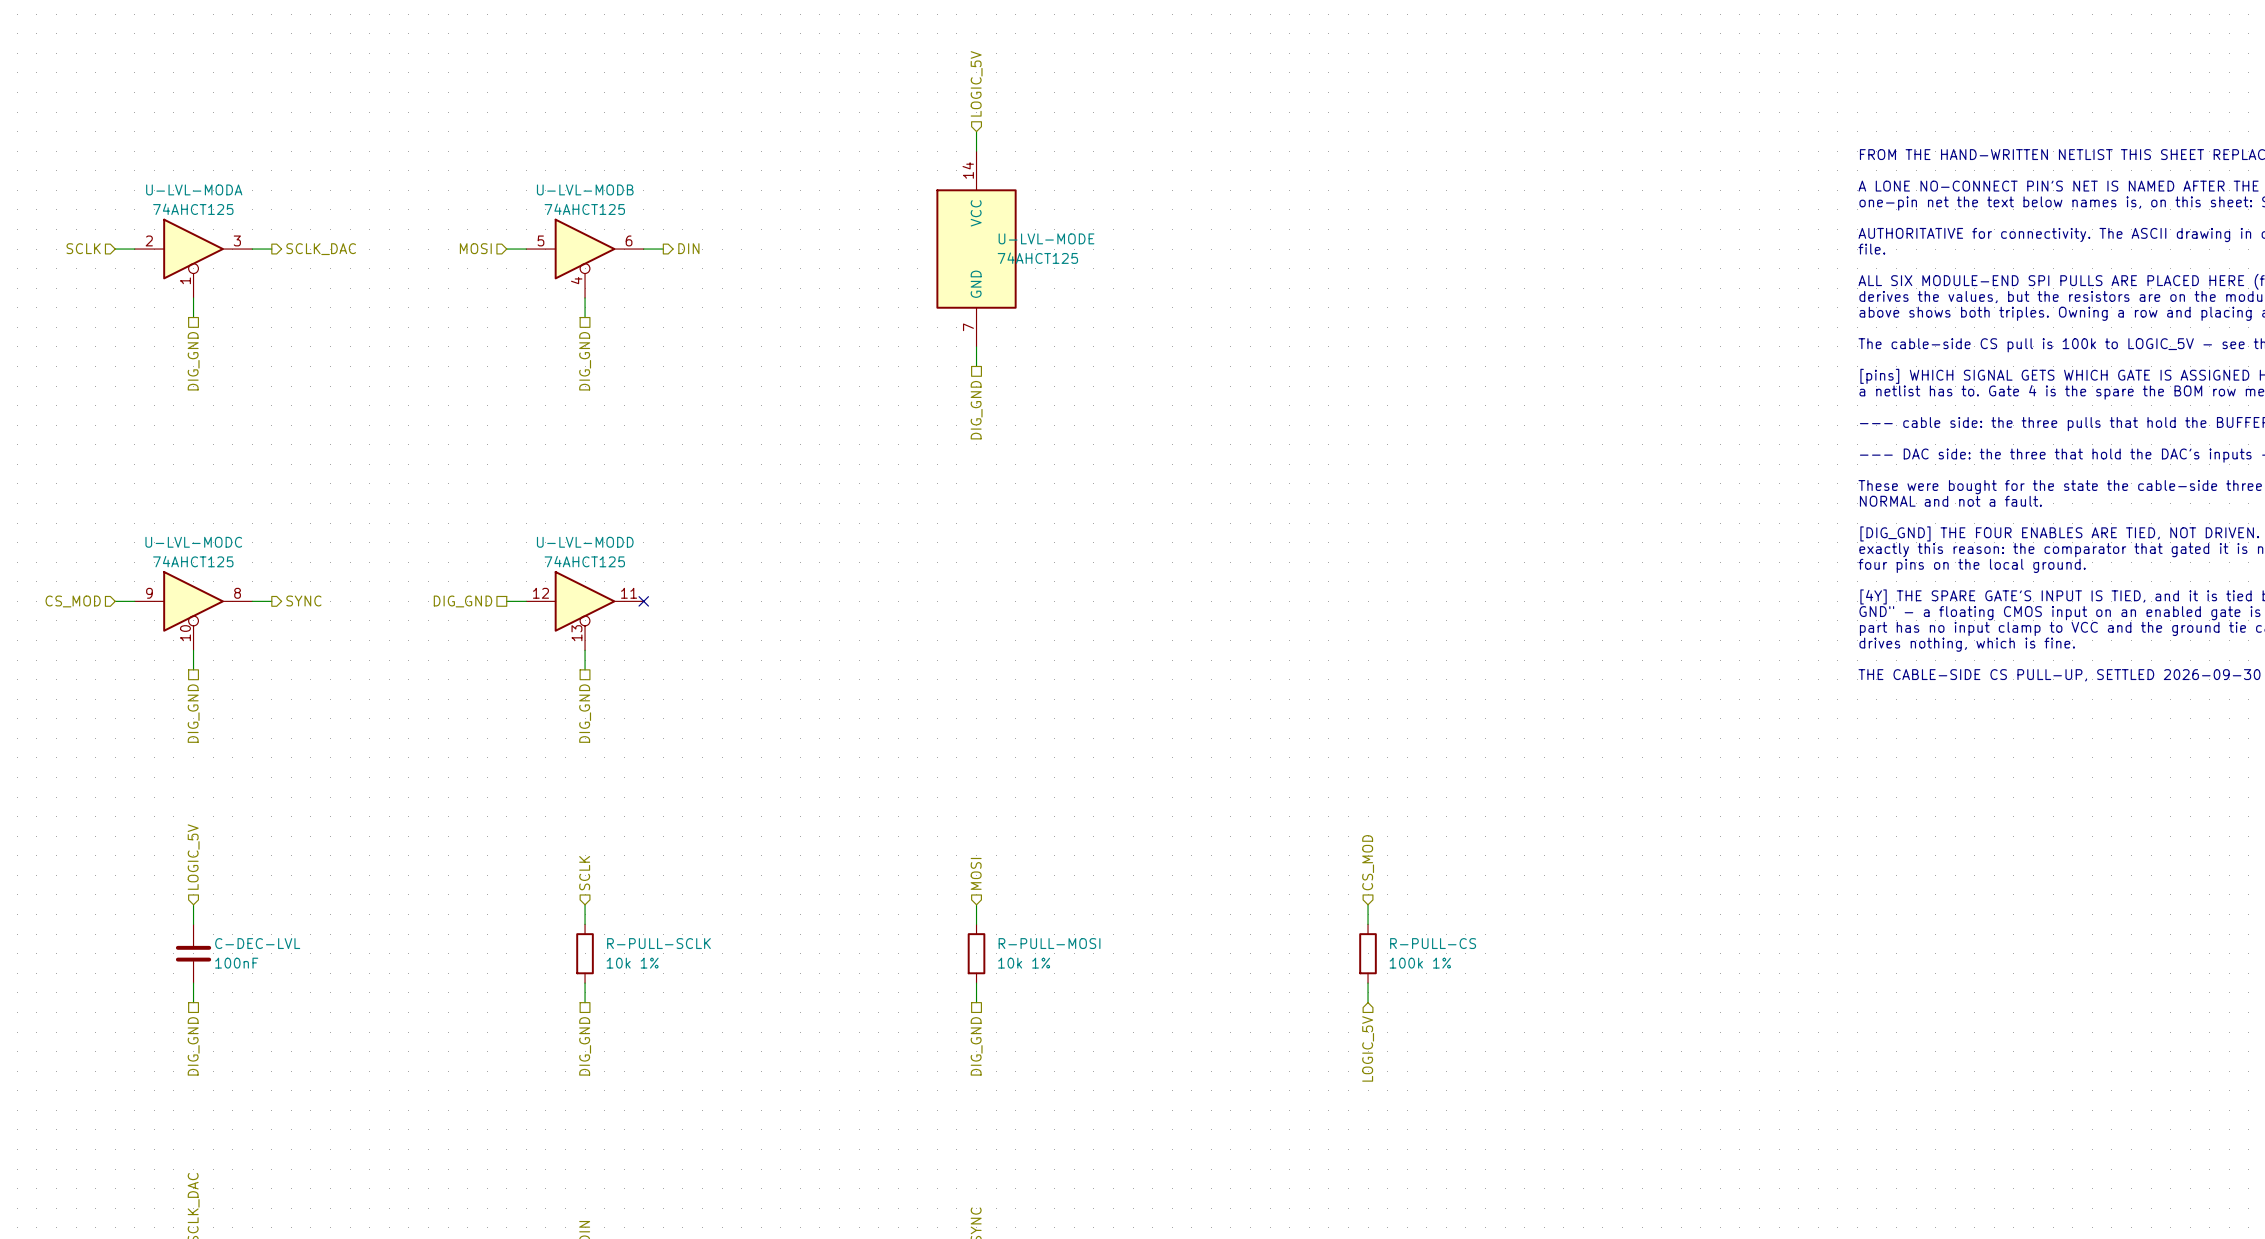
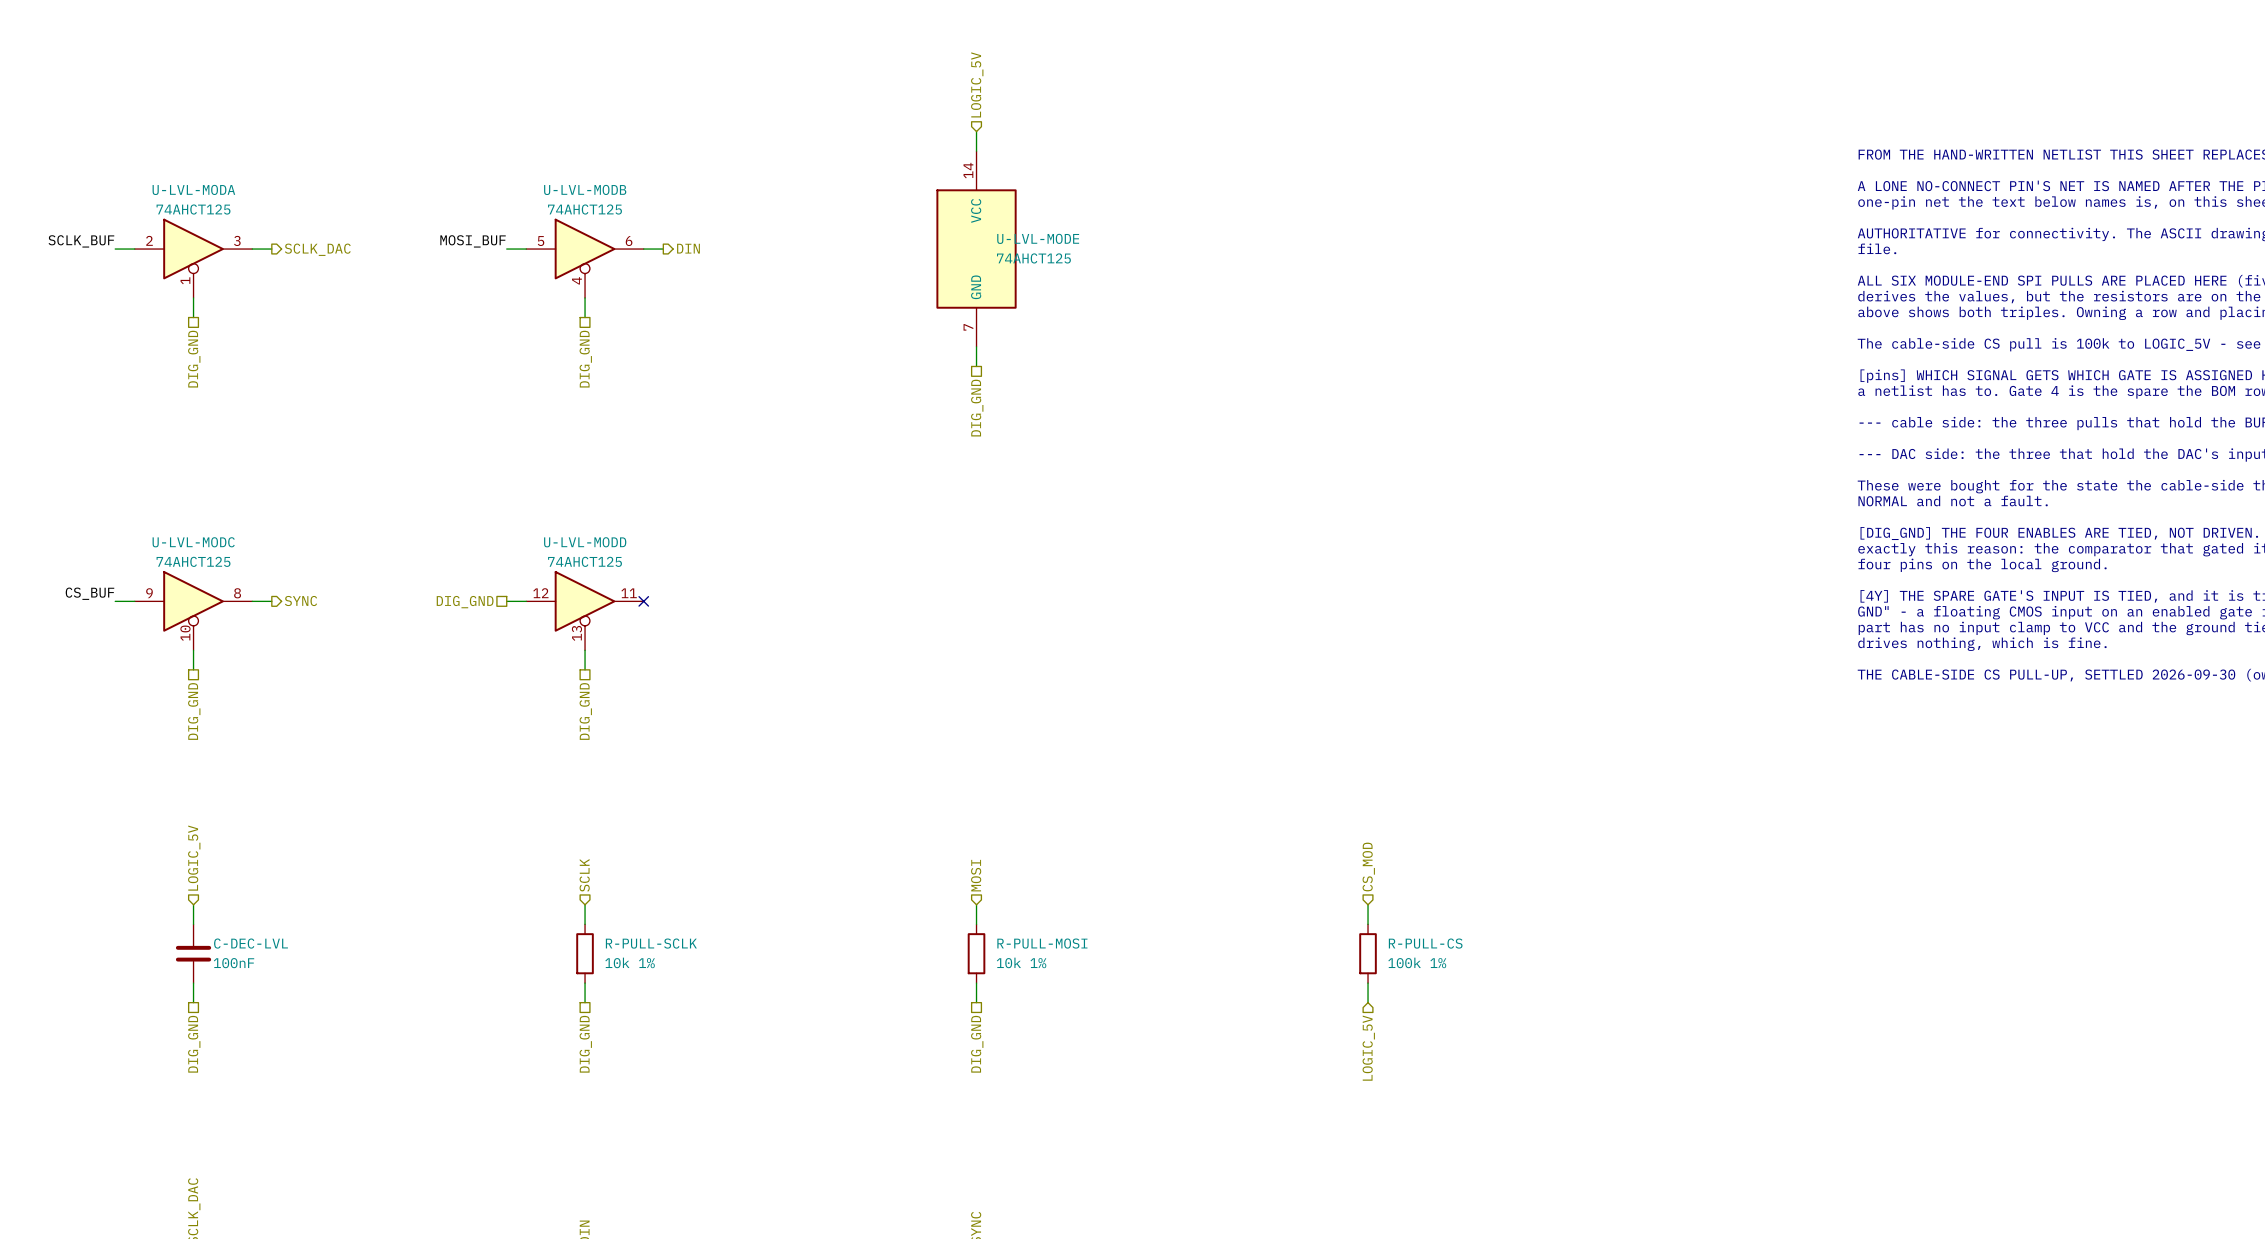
label: none -> SCLK_BUF (81, 241)
label: none -> MOSI_BUF (473, 241)
hierarchical label: SCLK (83, 248) -> none
hierarchical label: MOSI (475, 248) -> none
label: none -> CS_BUF (89, 593)
hierarchical label: CS_MOD (73, 601) -> none

